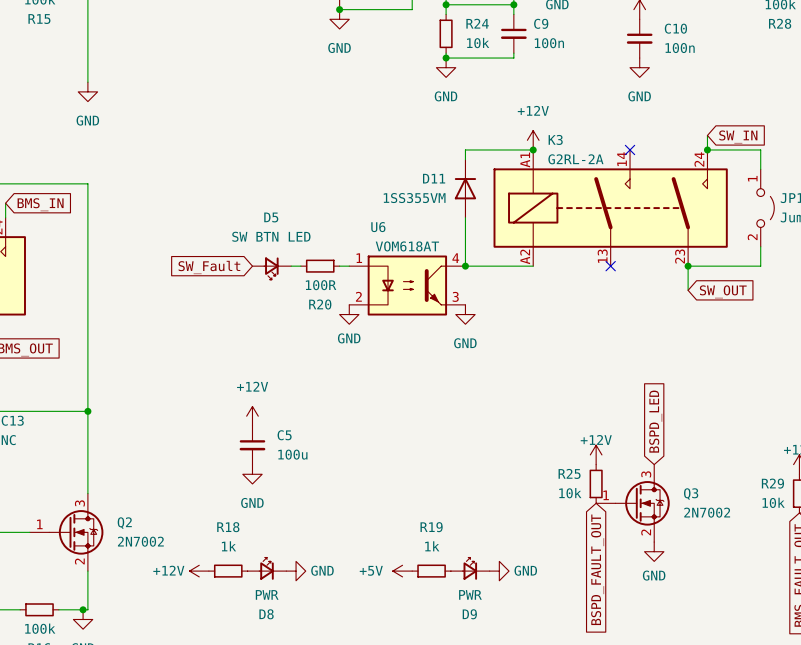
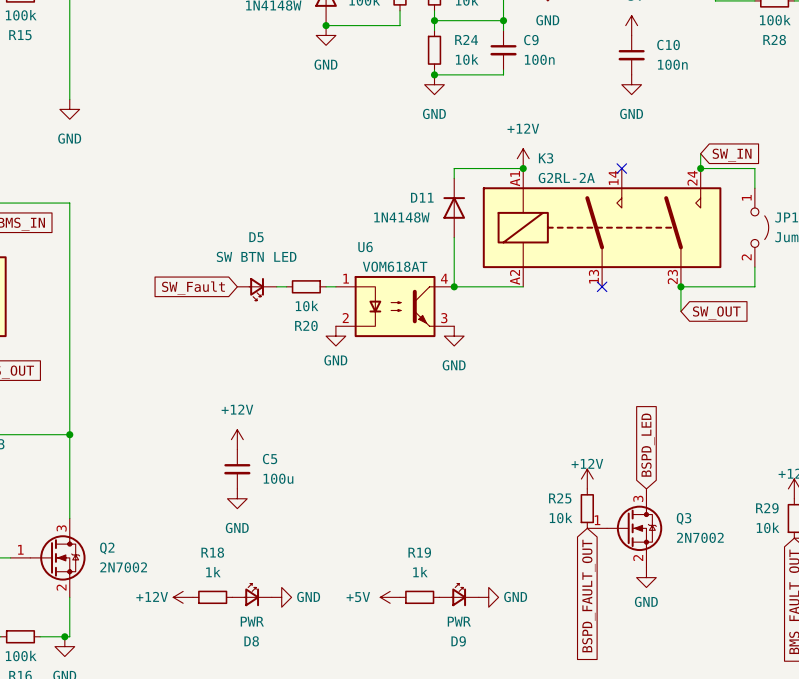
D11 value: 1SS355VM (414, 198) -> 1N4148W (401, 217)
R20 value: 100R (321, 285) -> 10k (307, 306)

